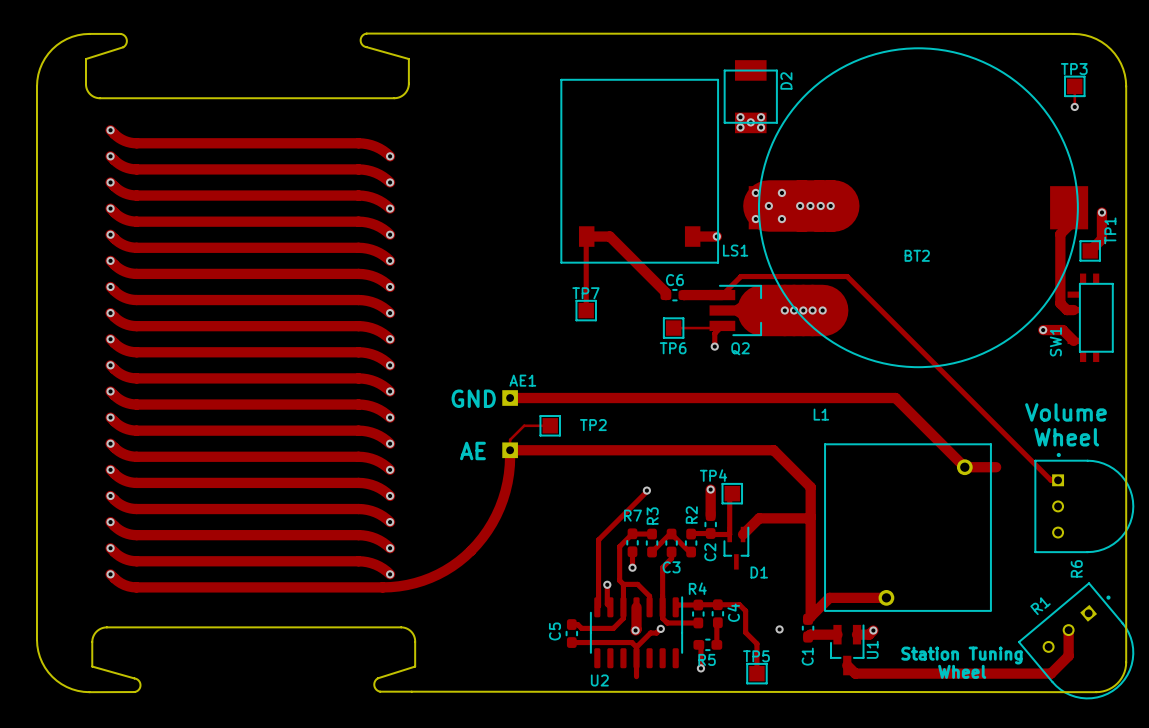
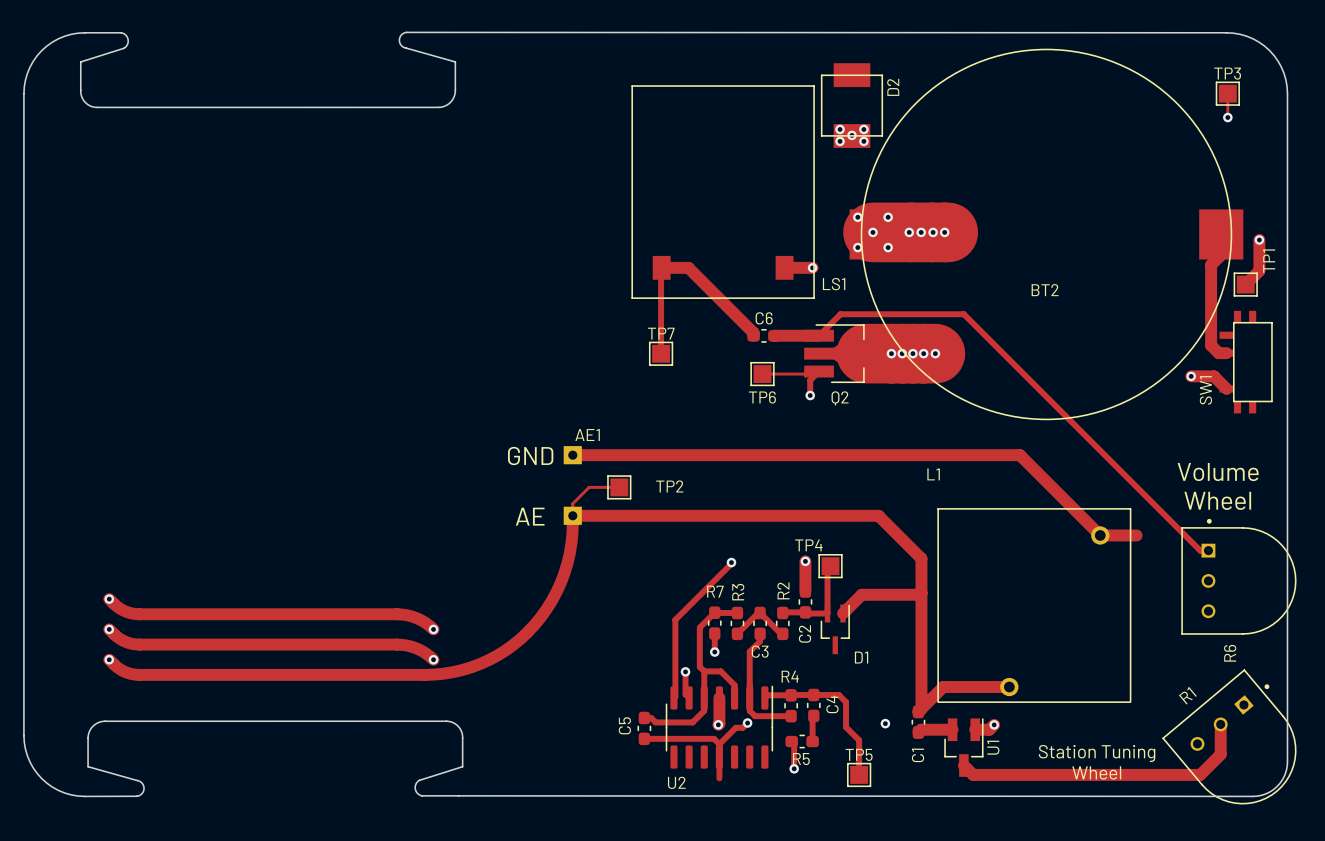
track: (110, 130) (121, 139) (133, 143) (362, 143) (375, 146) (390, 156) -> none
via: (110, 130) -> none
track: (110, 156) (121, 165) (133, 169) (362, 169) (379, 174) (390, 182) -> none
via: (110, 156) -> none
via: (390, 156) -> none
track: (110, 182) (121, 191) (133, 195) (362, 195) (379, 200) (390, 208) -> none
via: (110, 182) -> none
via: (390, 182) -> none
track: (110, 208) (121, 217) (133, 221) (362, 221) (375, 225) (390, 234) -> none
via: (110, 208) -> none
via: (390, 208) -> none
track: (110, 234) (121, 244) (133, 247) (362, 248) (379, 253) (390, 260) -> none
via: (110, 234) -> none
via: (390, 234) -> none
track: (110, 260) (121, 270) (133, 273) (362, 274) (379, 279) (390, 286) -> none
via: (110, 260) -> none
via: (390, 260) -> none
track: (110, 286) (121, 296) (133, 299) (362, 300) (379, 305) (390, 313) -> none
via: (110, 286) -> none
via: (390, 286) -> none
track: (110, 313) (121, 322) (133, 326) (362, 326) (379, 331) (390, 339) -> none
via: (110, 313) -> none
via: (390, 313) -> none
track: (110, 339) (121, 348) (133, 352) (362, 352) (375, 355) (390, 365) -> none
via: (110, 339) -> none
via: (390, 339) -> none
track: (110, 365) (121, 374) (133, 378) (362, 378) (379, 383) (390, 391) -> none
via: (110, 365) -> none
via: (390, 365) -> none
track: (110, 391) (121, 400) (133, 404) (362, 404) (379, 409) (390, 417) -> none
via: (110, 391) -> none
via: (390, 391) -> none
track: (110, 417) (121, 426) (133, 430) (362, 430) (379, 435) (390, 443) -> none
via: (110, 417) -> none
via: (390, 417) -> none
track: (110, 443) (121, 453) (133, 456) (362, 457) (375, 460) (390, 469) -> none
via: (110, 443) -> none
via: (390, 443) -> none
track: (110, 469) (121, 479) (133, 482) (362, 483) (375, 486) (390, 495) -> none
via: (110, 469) -> none
via: (390, 469) -> none
track: (110, 495) (121, 505) (133, 508) (362, 509) (379, 514) (390, 522) -> none
via: (110, 495) -> none
via: (390, 495) -> none
via: (390, 522) -> none

